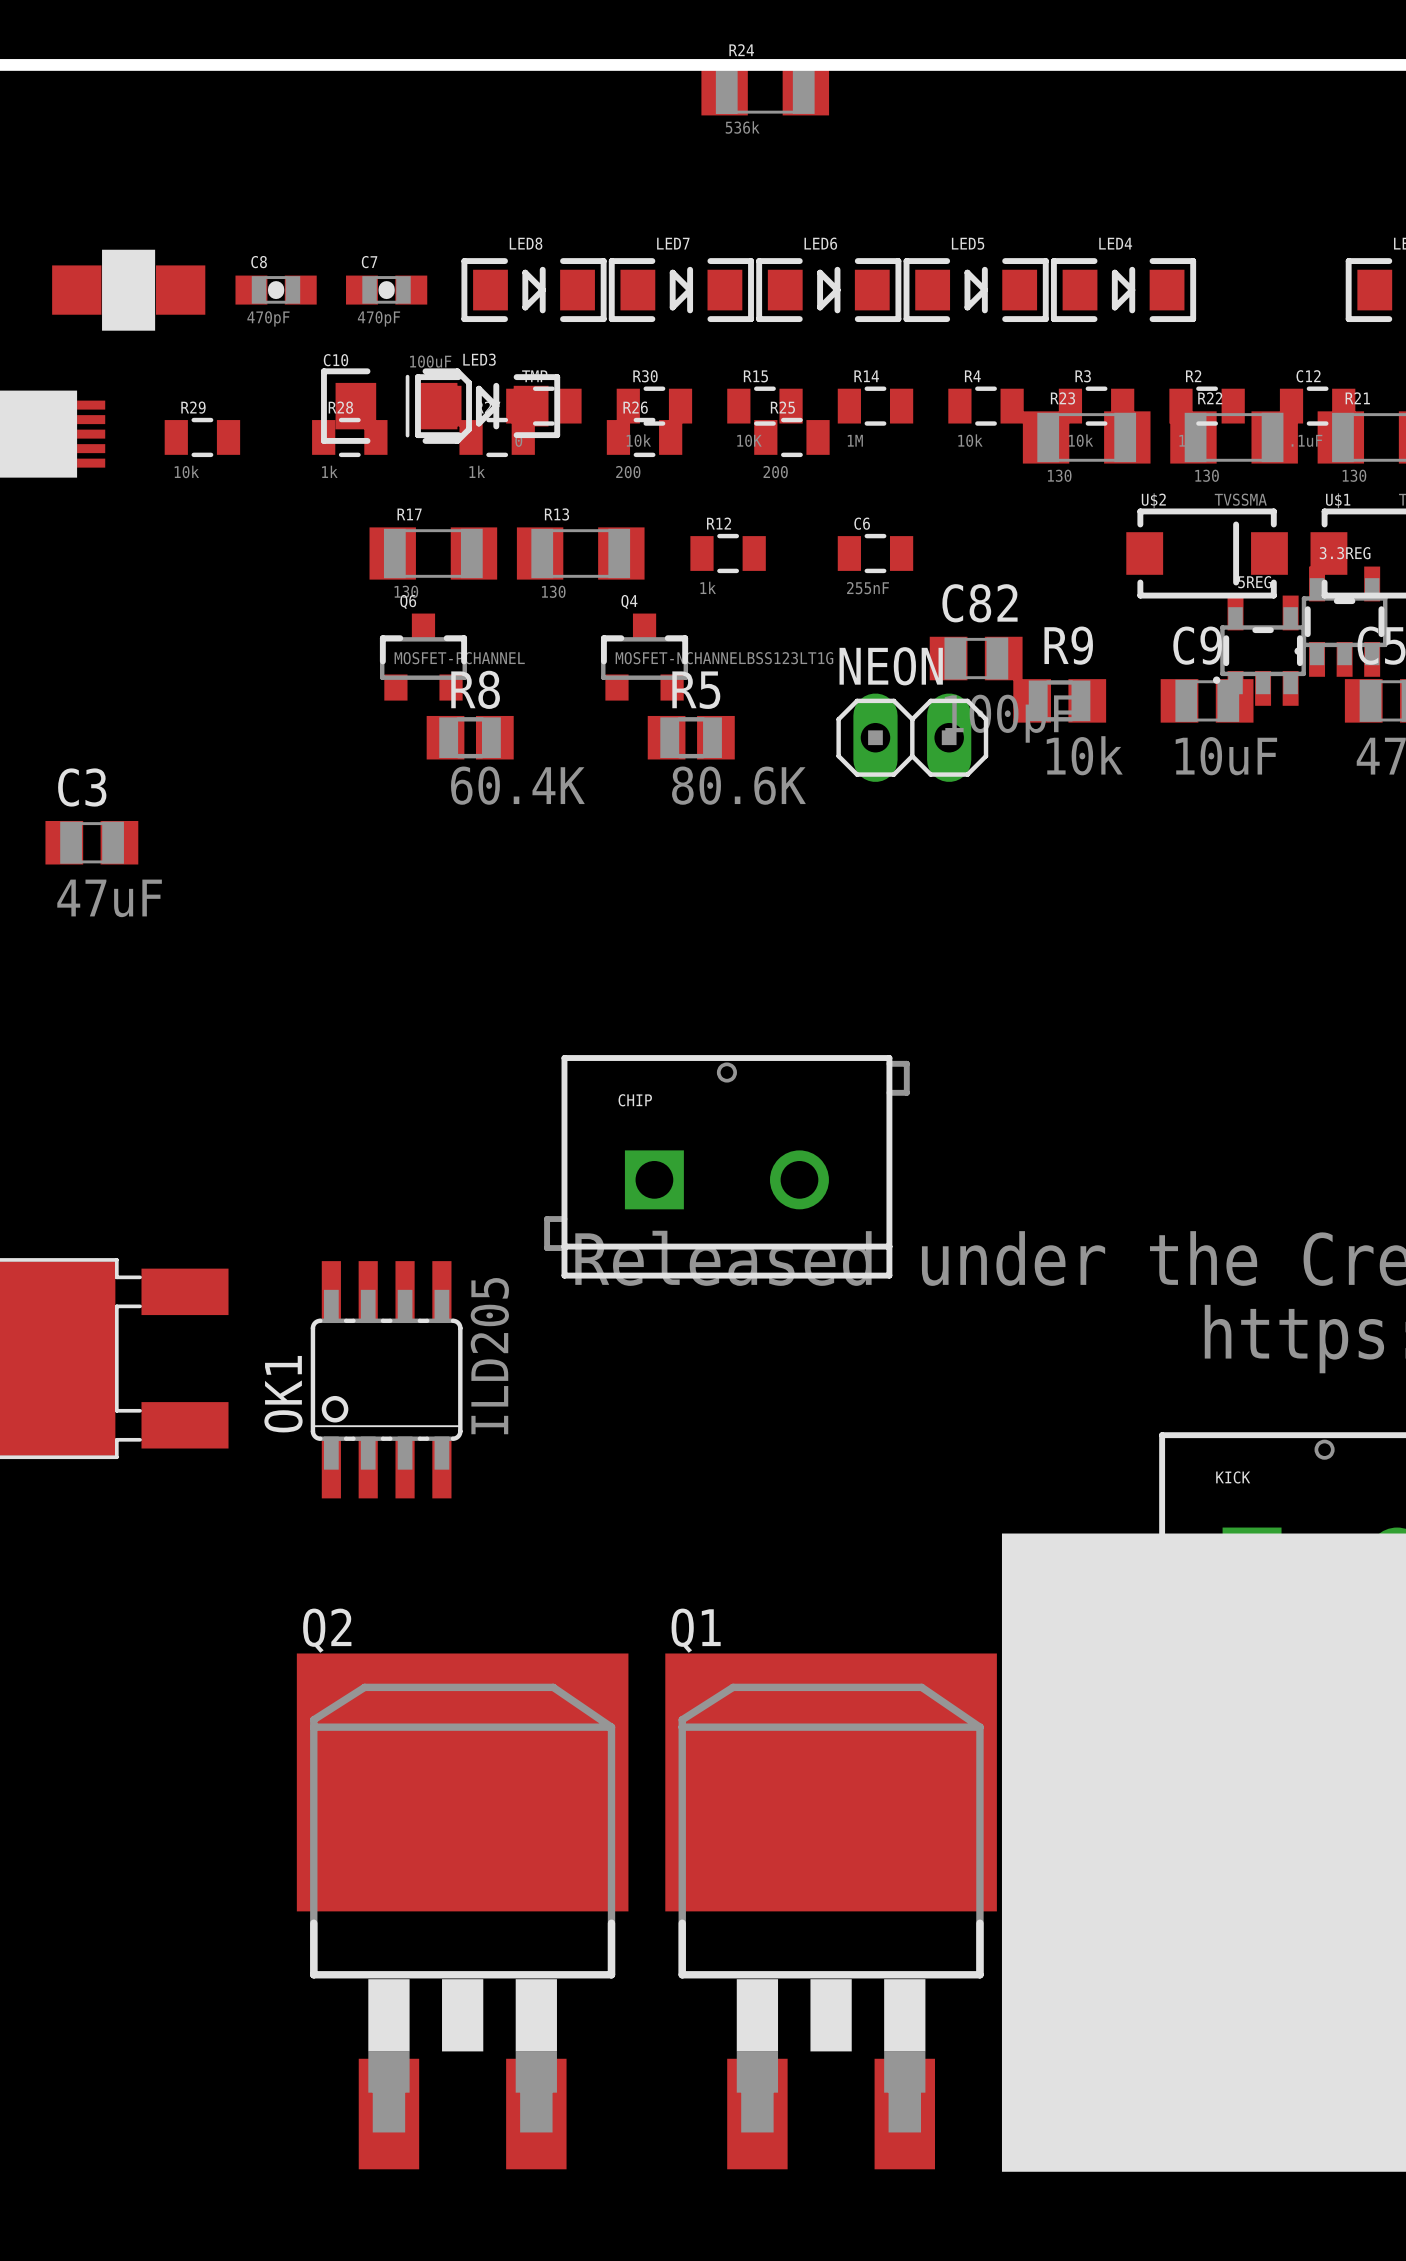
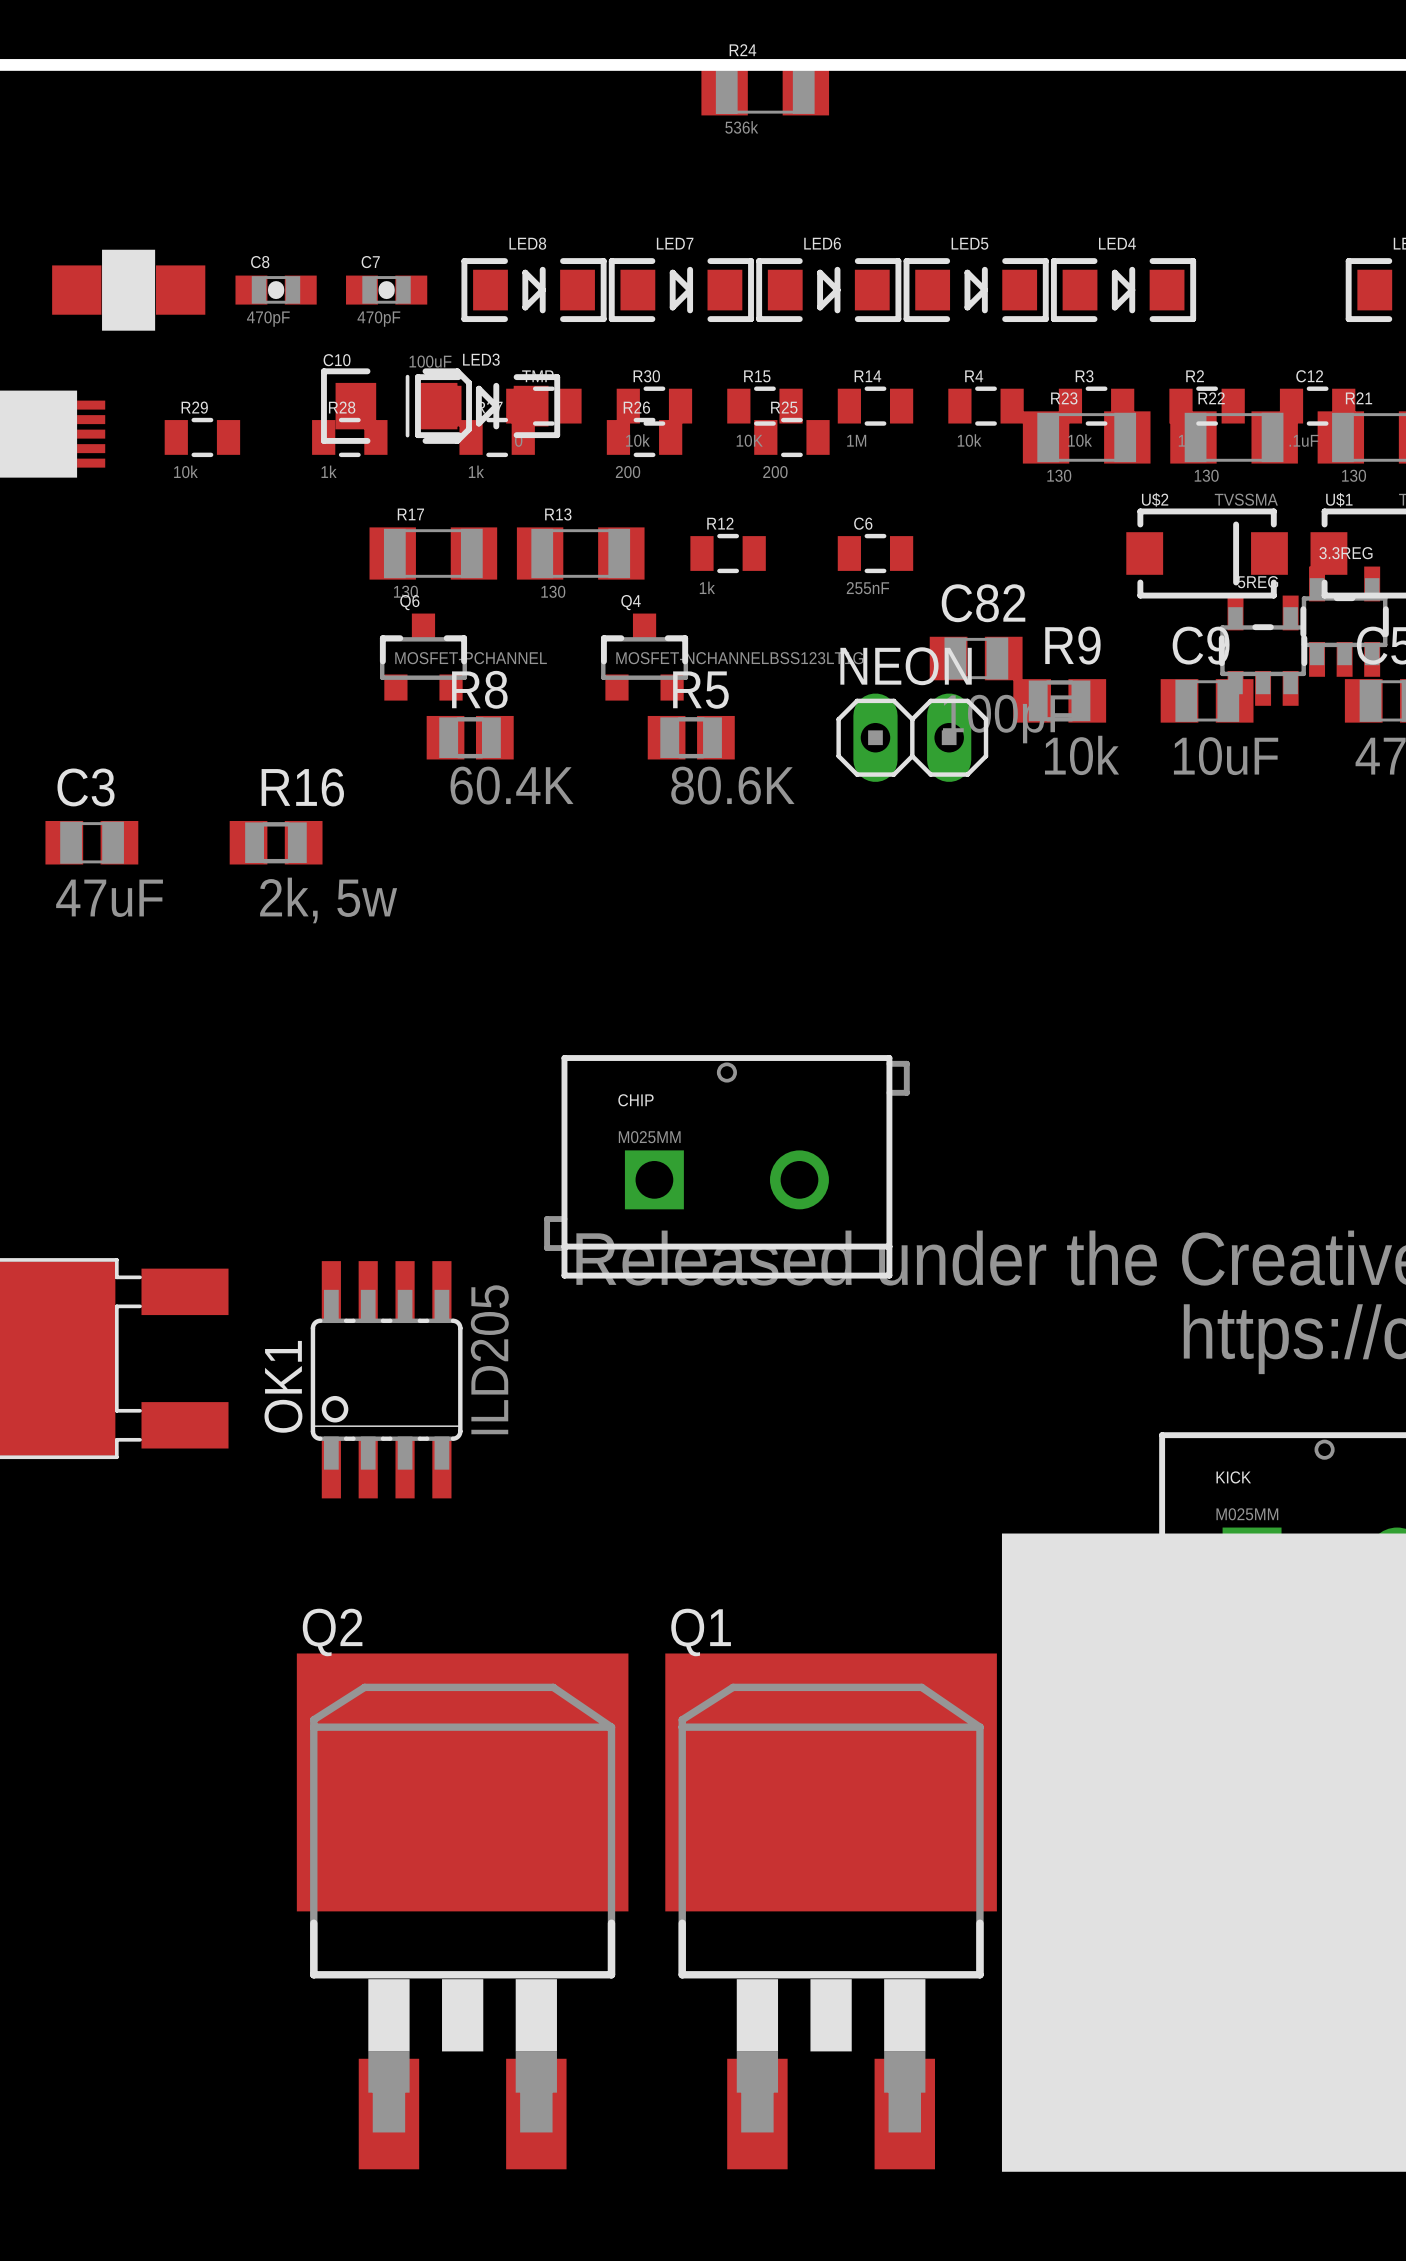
3.3REG footprint: [1294, 566, 1388, 677] -> [1300, 566, 1389, 677]
5REG footprint: [1212, 595, 1306, 706] -> [1218, 595, 1308, 706]
R16: none -> 2k, 5w (276, 842)
CHIP value: none -> M025MM (649, 1137)
KICK value: none -> M025MM (1247, 1514)

